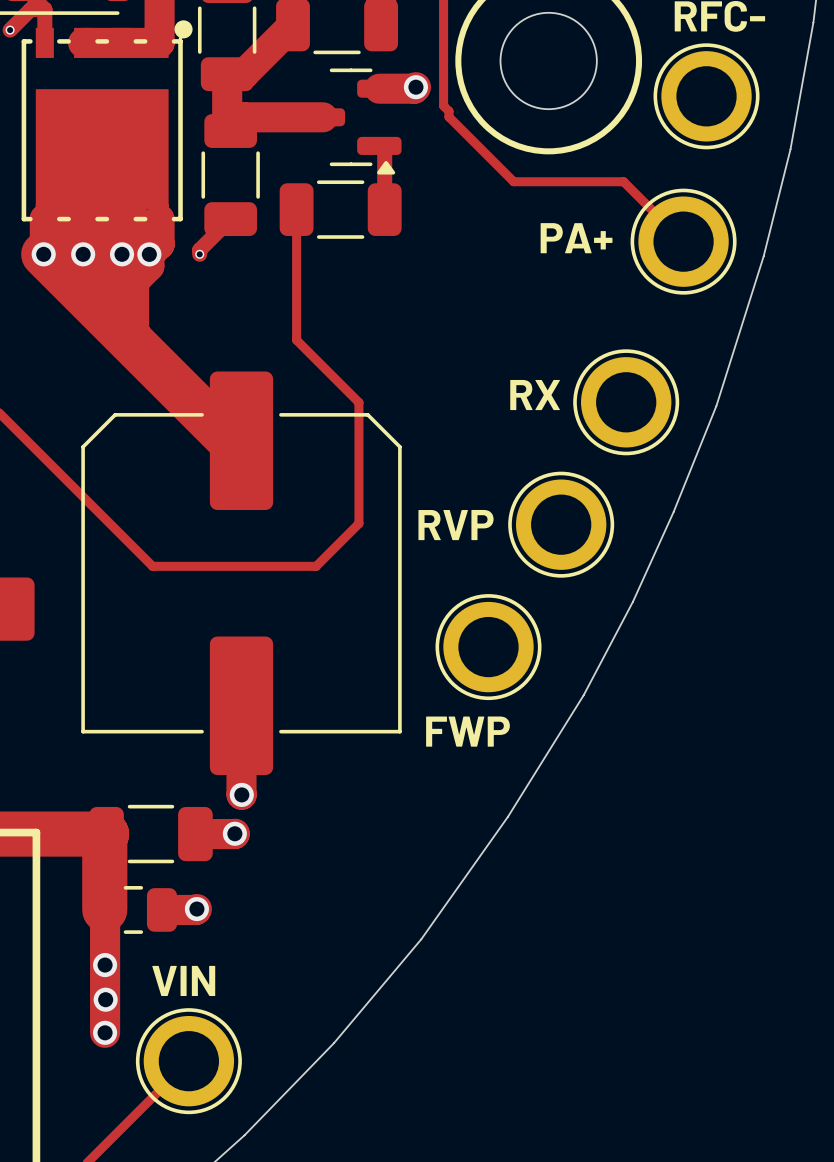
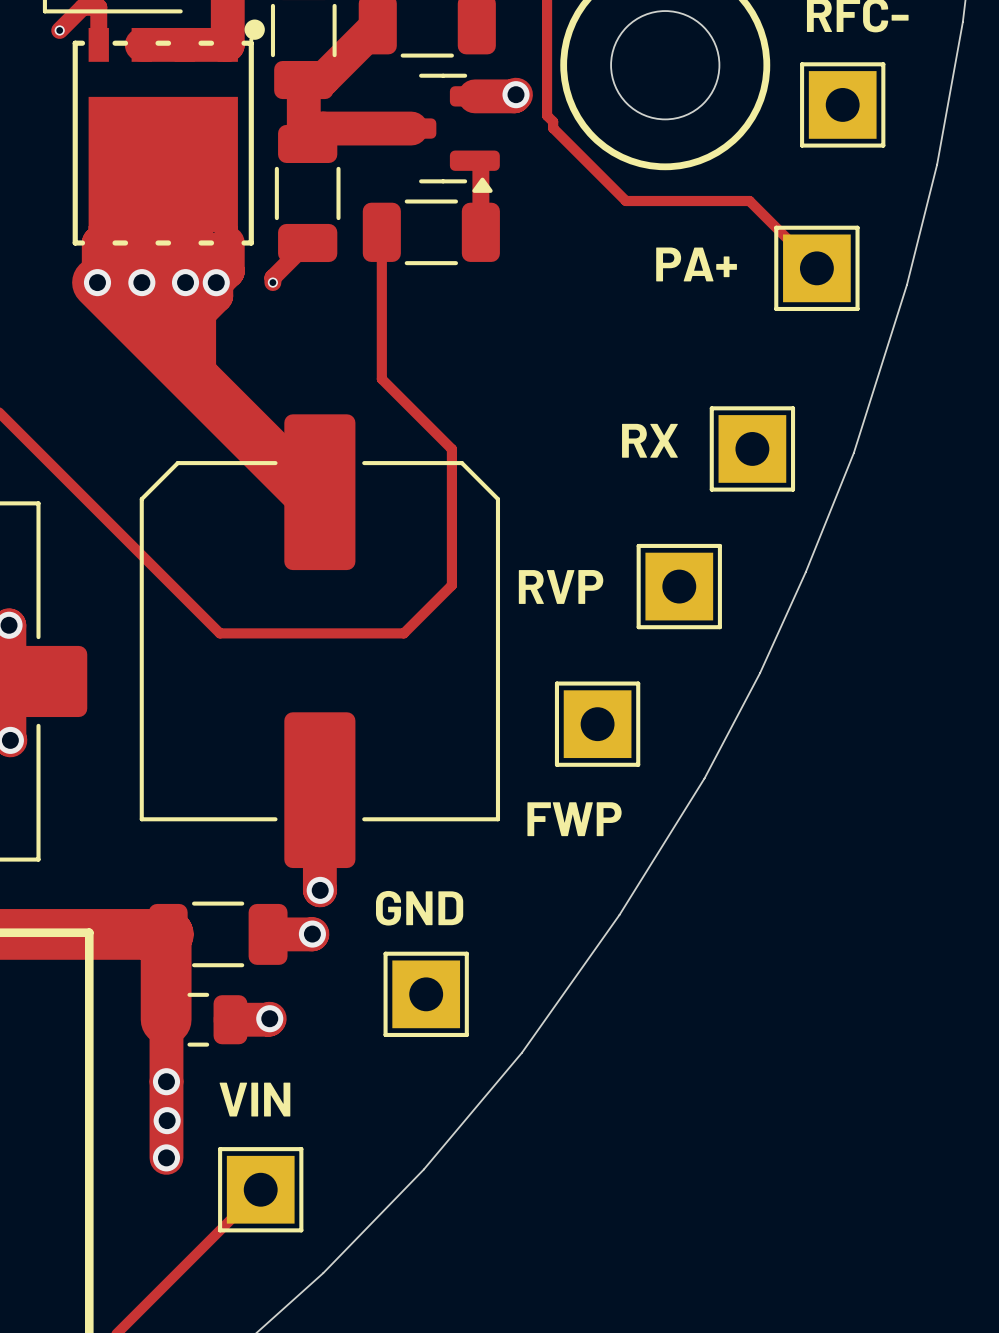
part footprint: [653, 43, 760, 150] -> [800, 62, 886, 148]
part footprint: [630, 188, 737, 295] -> [774, 225, 860, 312]
part footprint: [573, 349, 680, 456] -> [709, 406, 796, 492]
part footprint: [508, 471, 615, 578] -> [636, 543, 722, 630]
part footprint: [435, 594, 542, 701] -> [554, 681, 641, 767]
text: none -> GND (419, 908)
part: none -> (426, 994)
part footprint: [135, 1008, 242, 1115] -> [218, 1147, 304, 1233]

